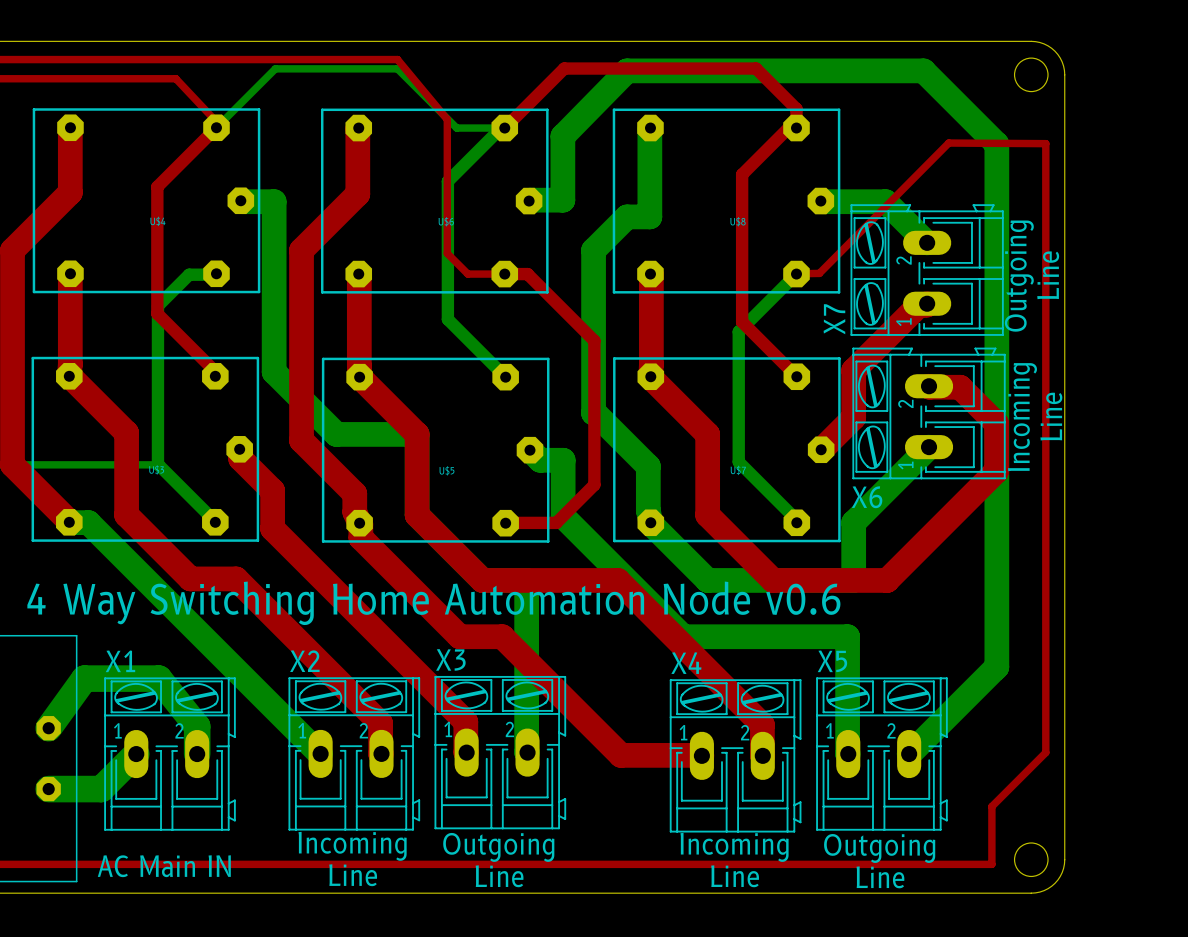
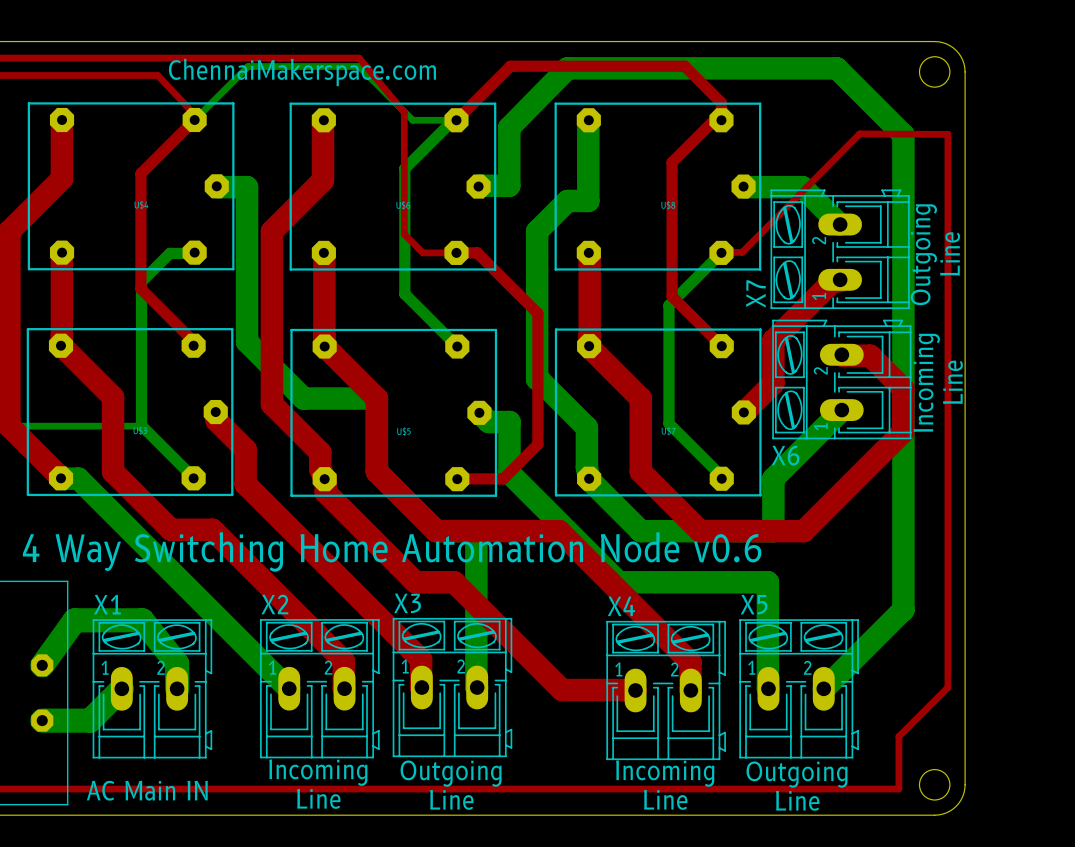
text: none -> ChennaiMakerspace.com (302, 72)

